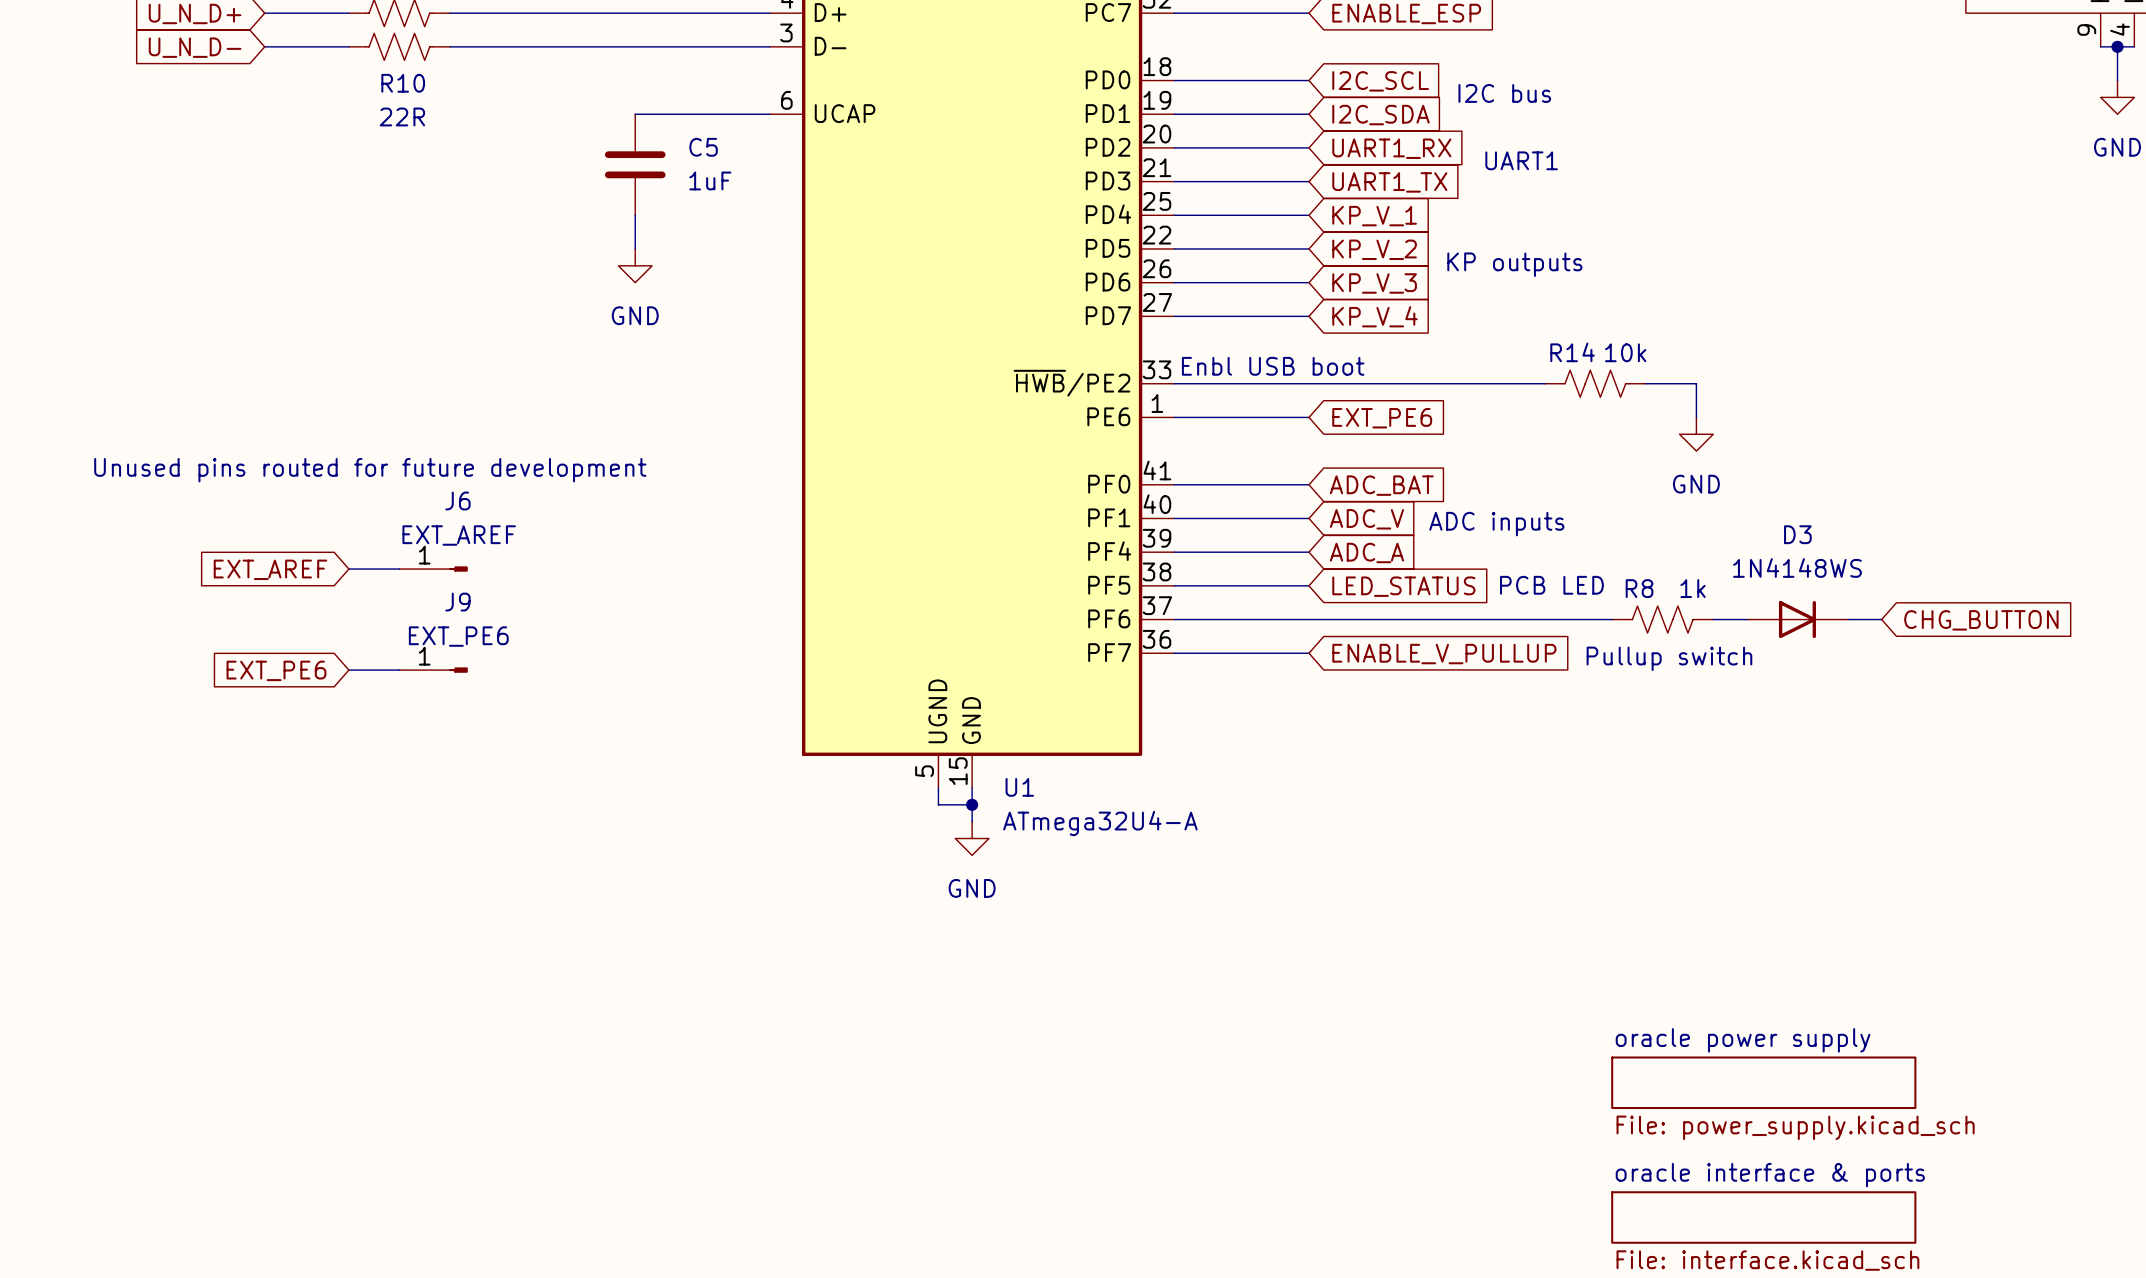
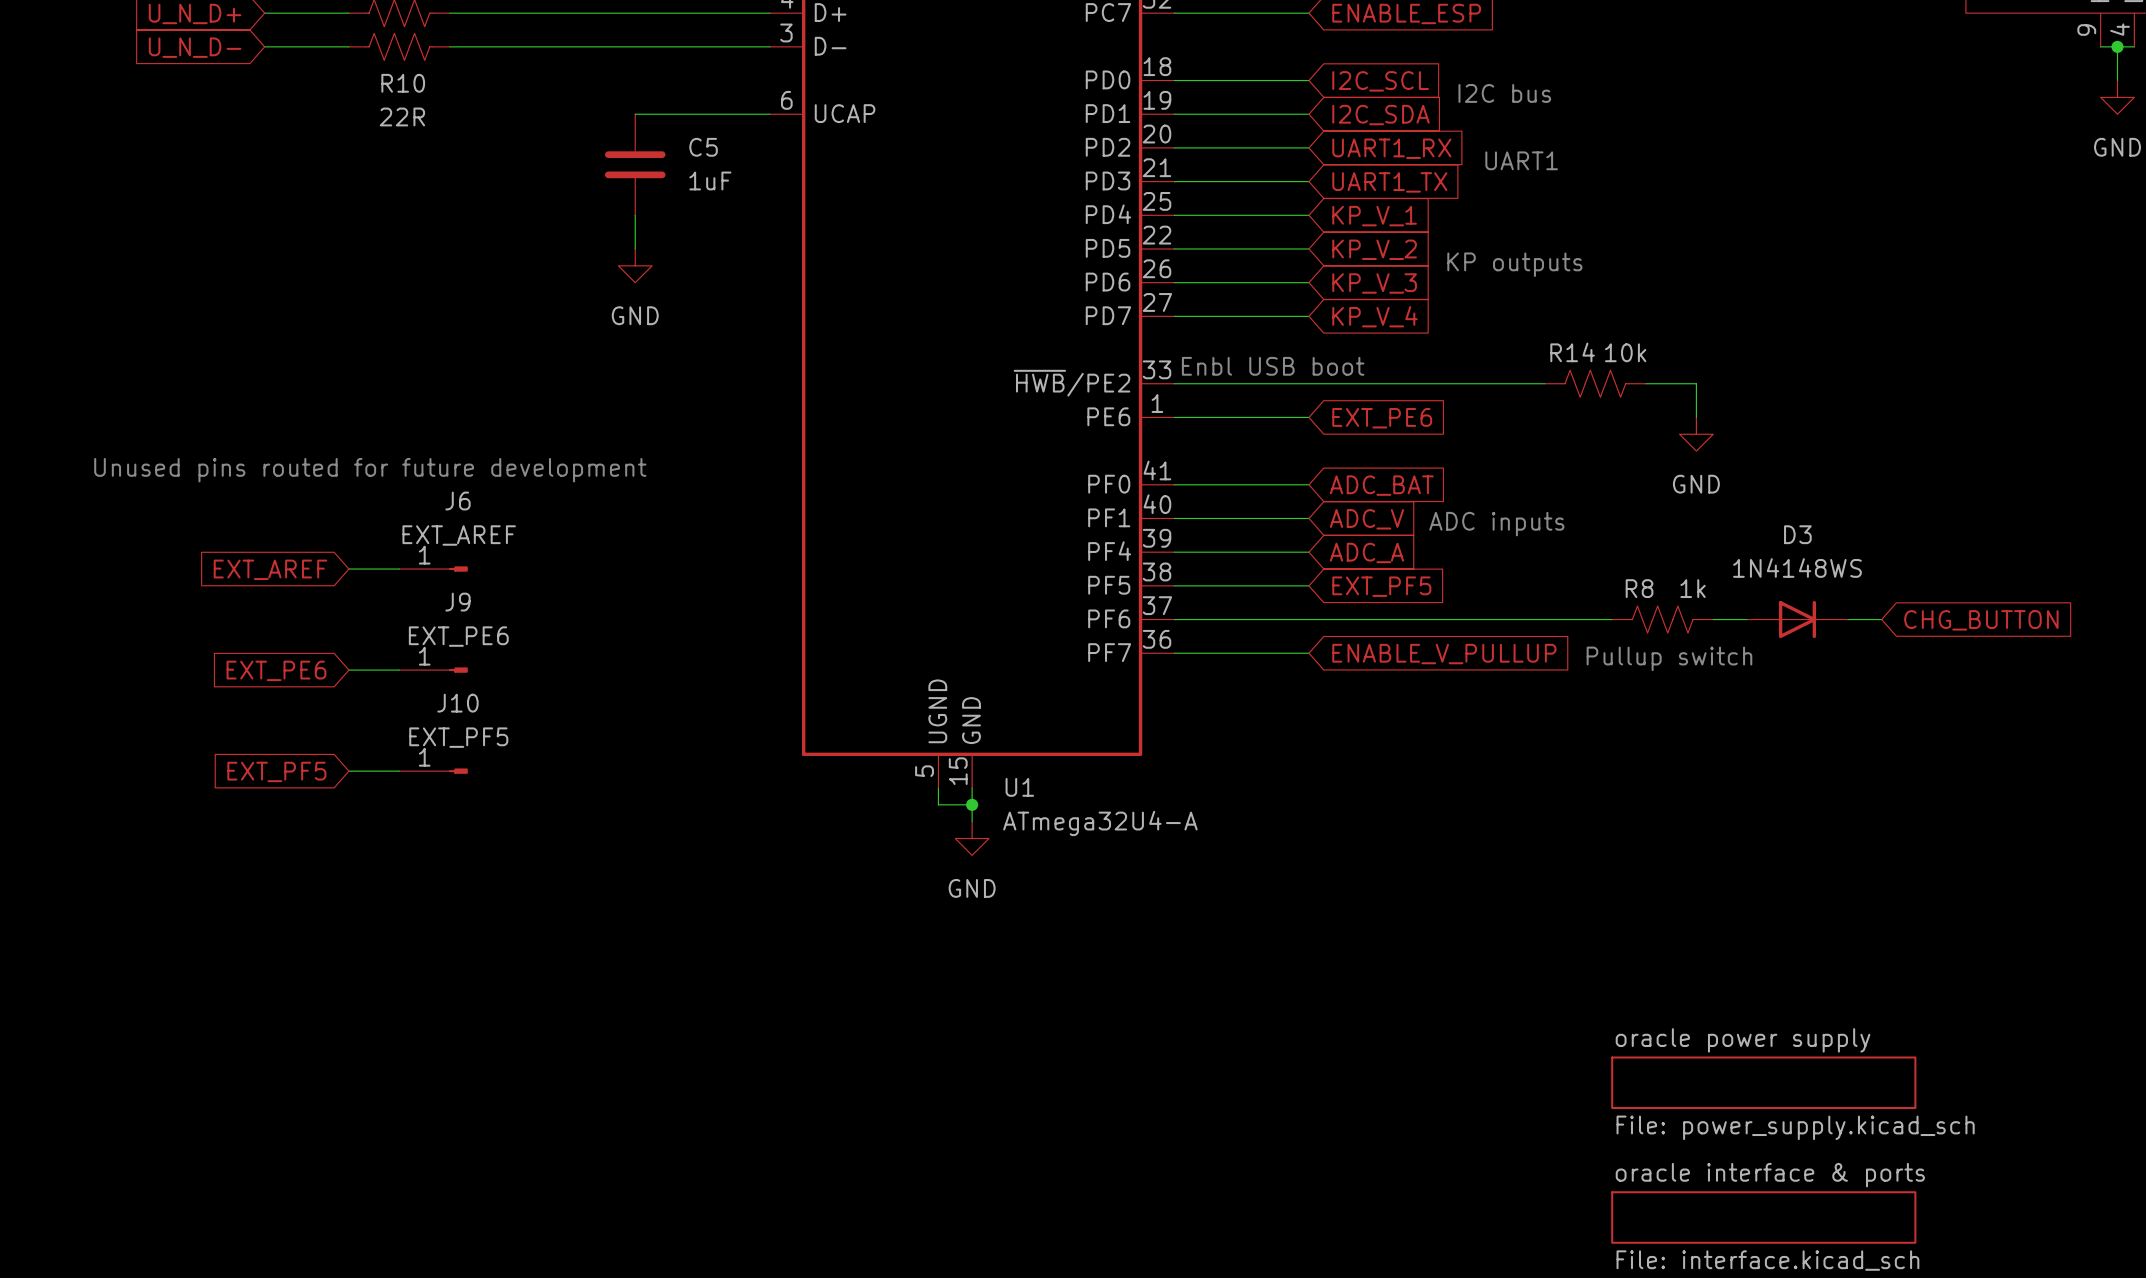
text: PCB LED (1551, 585) -> none
global label: LED_STATUS (1403, 586) -> EXT_PF5 (1381, 586)
global label: none -> EXT_PF5 (276, 771)
wire: none -> (348, 771) (399, 771)
J10: none -> EXT_PF5 (433, 771)

